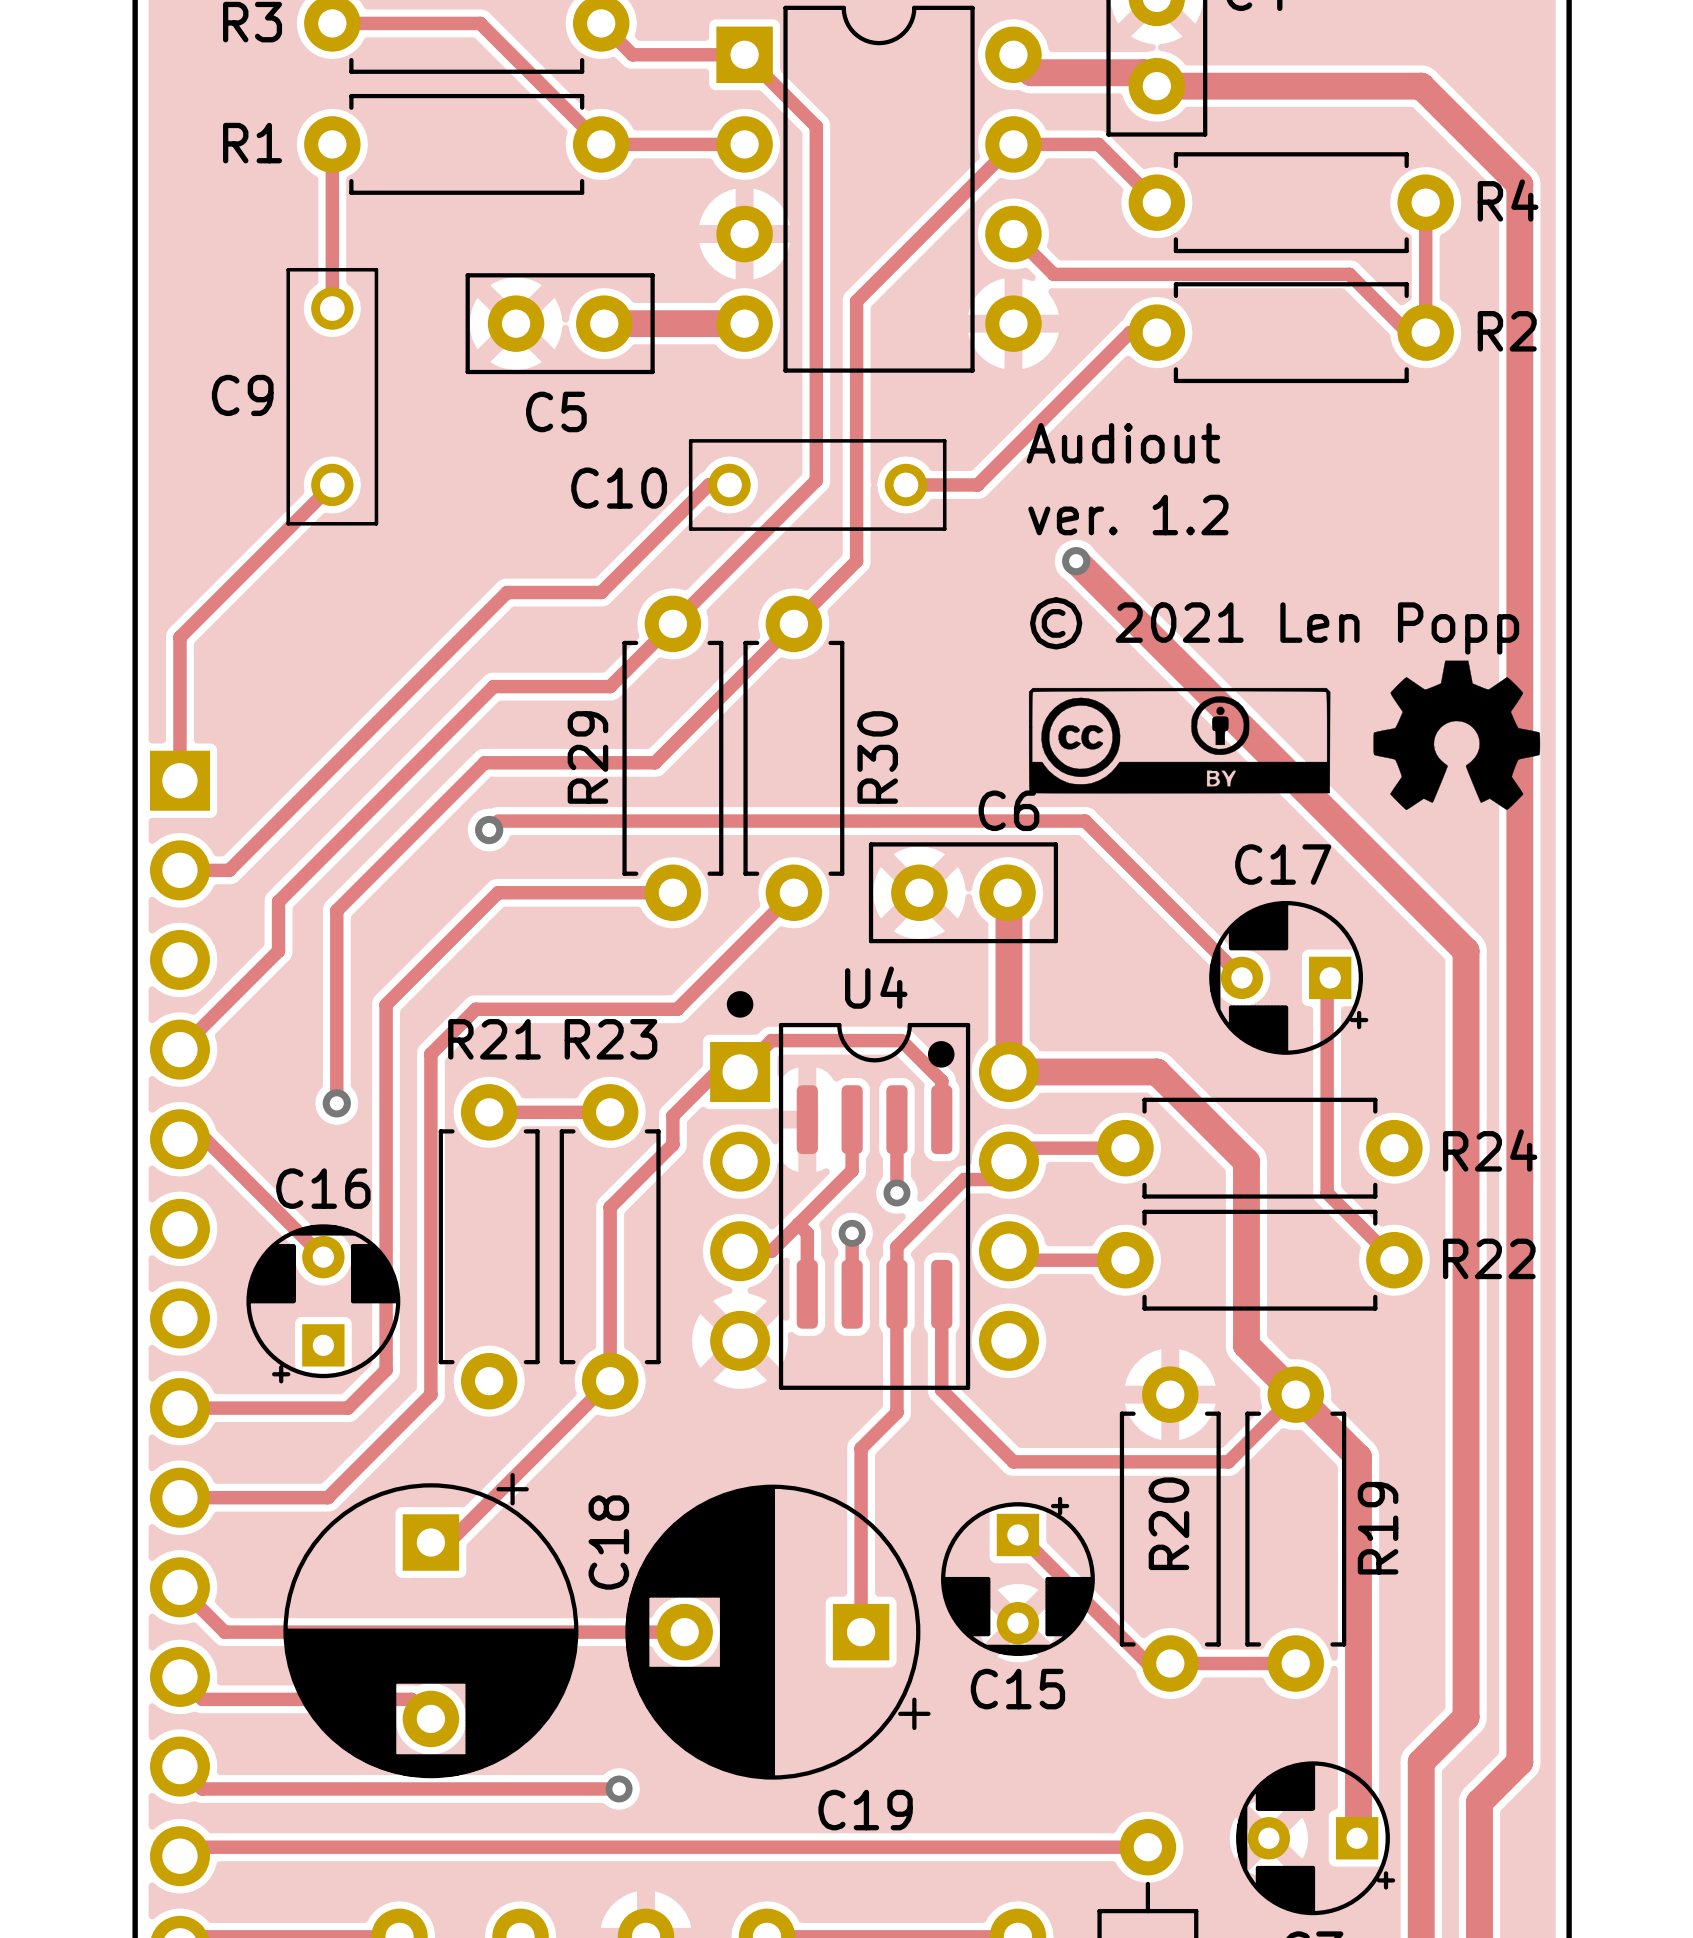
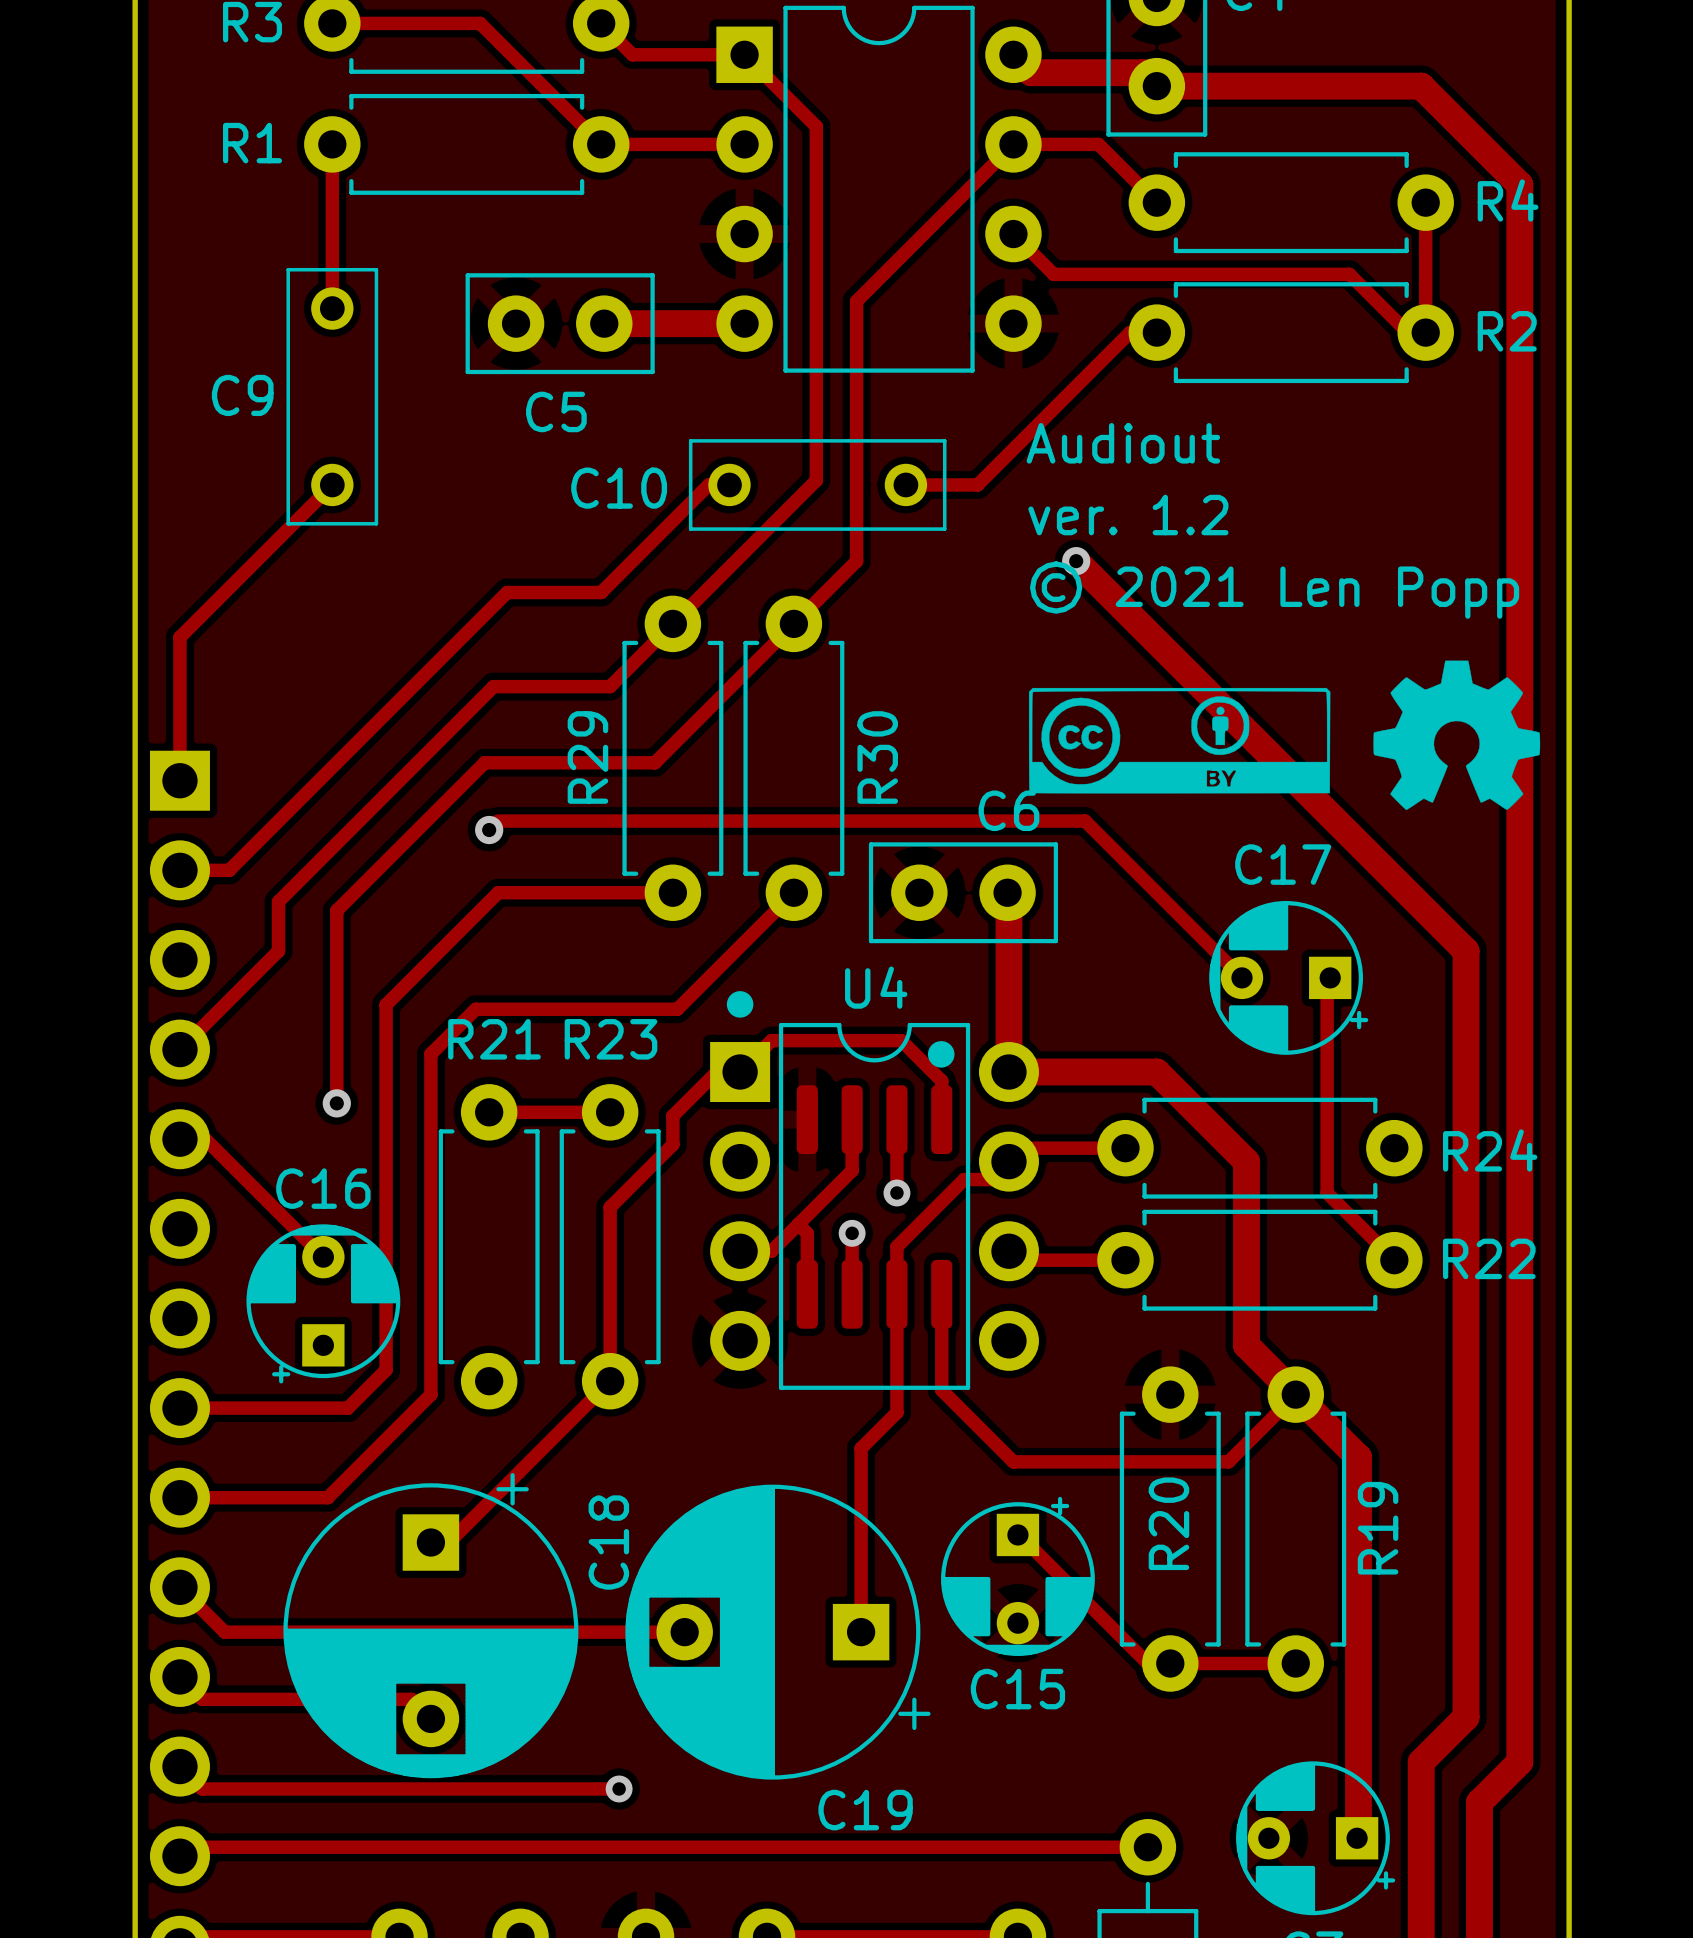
text position: © 2021 Len Popp (1274, 625) -> © 2021 Len Popp (1274, 590)

